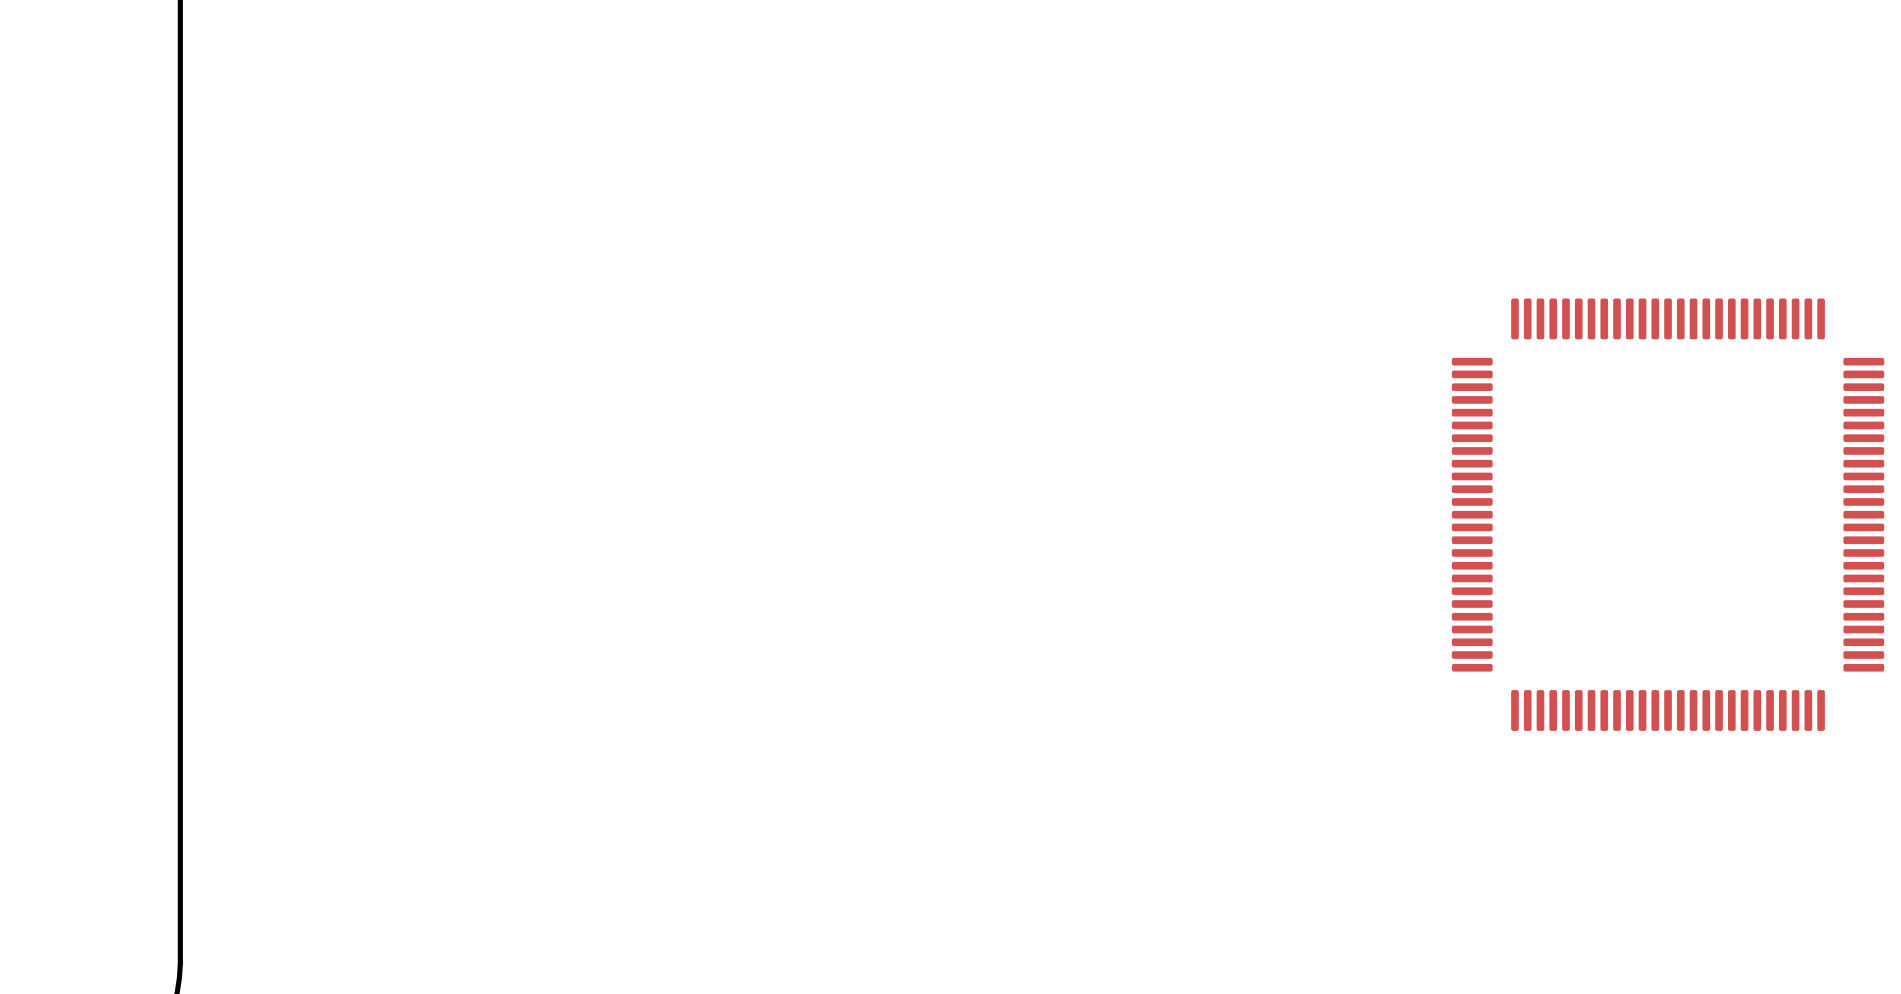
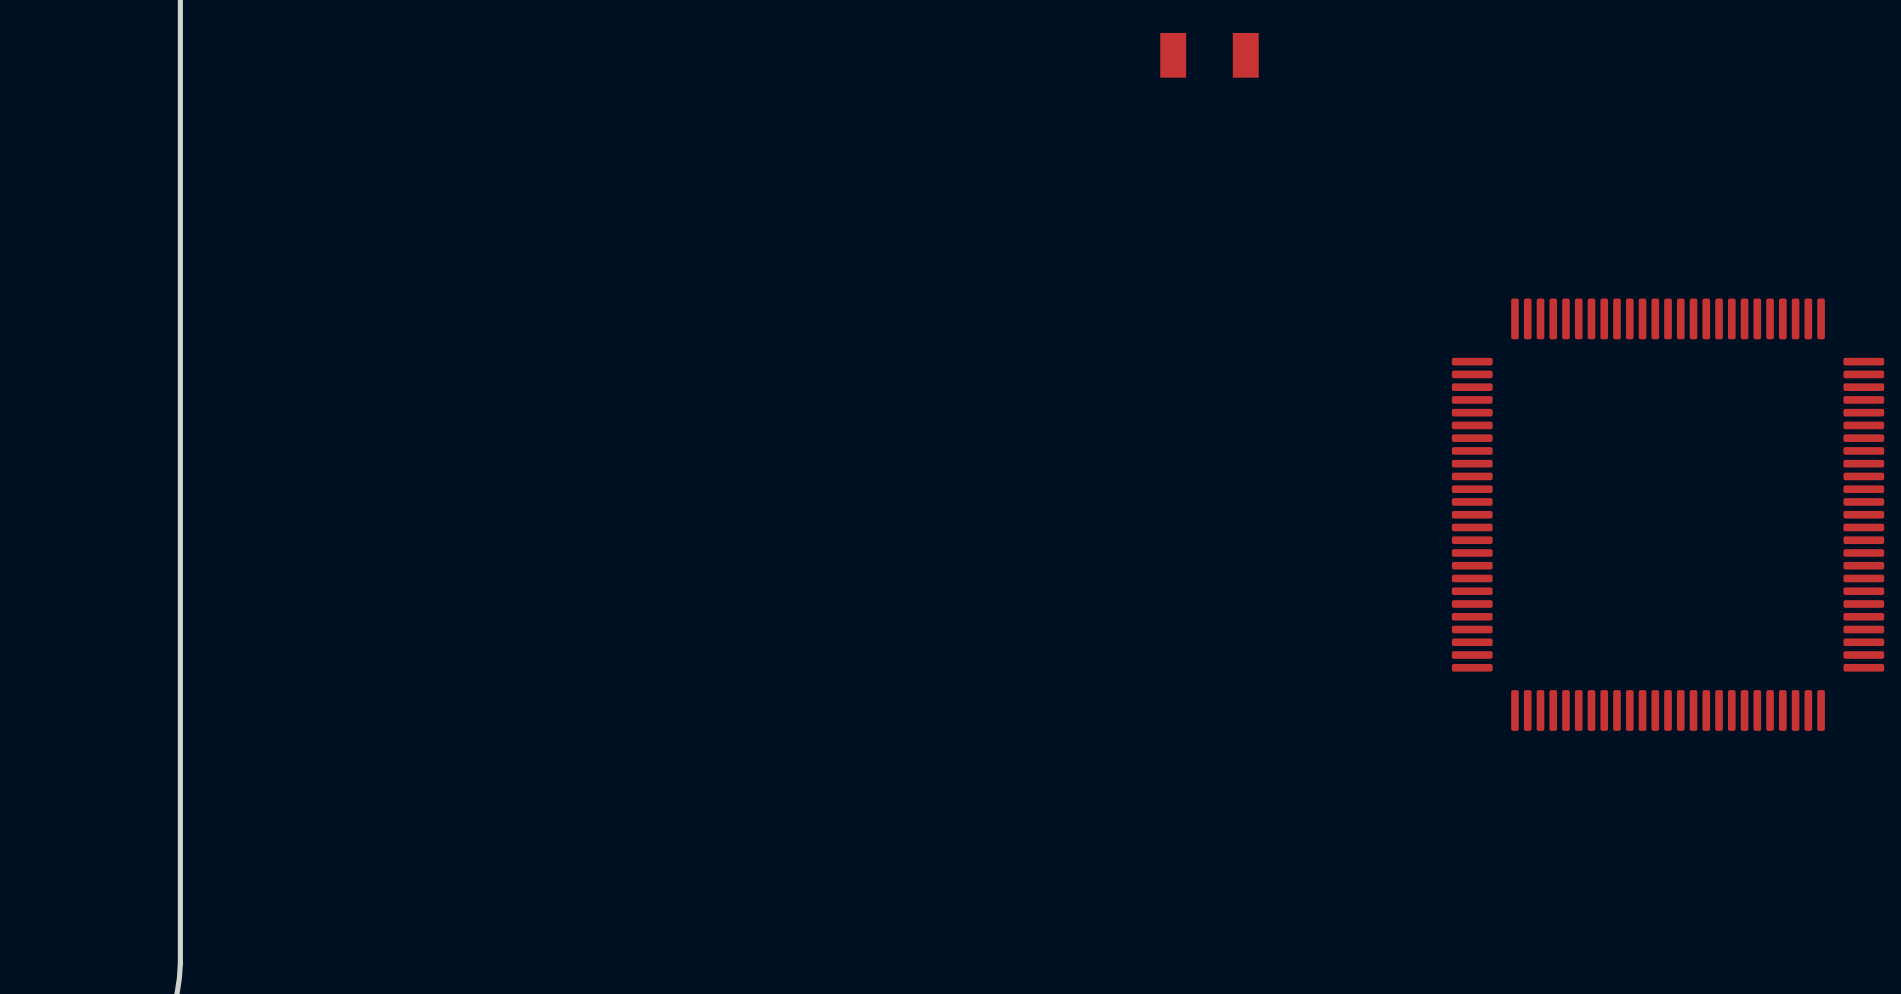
part: none -> (1209, 55)

